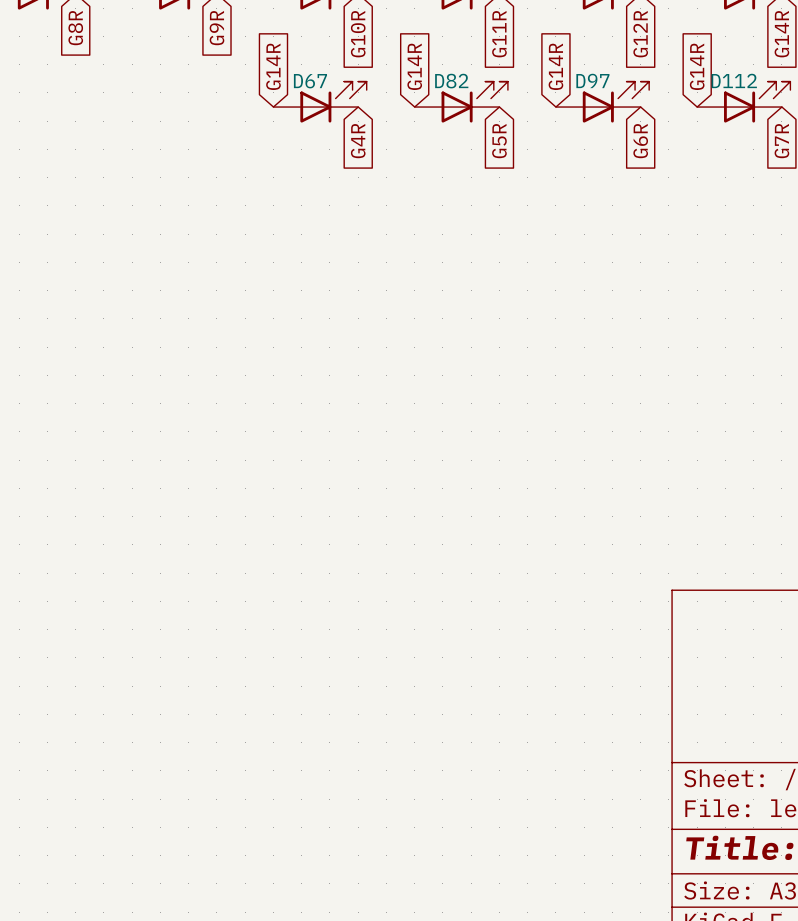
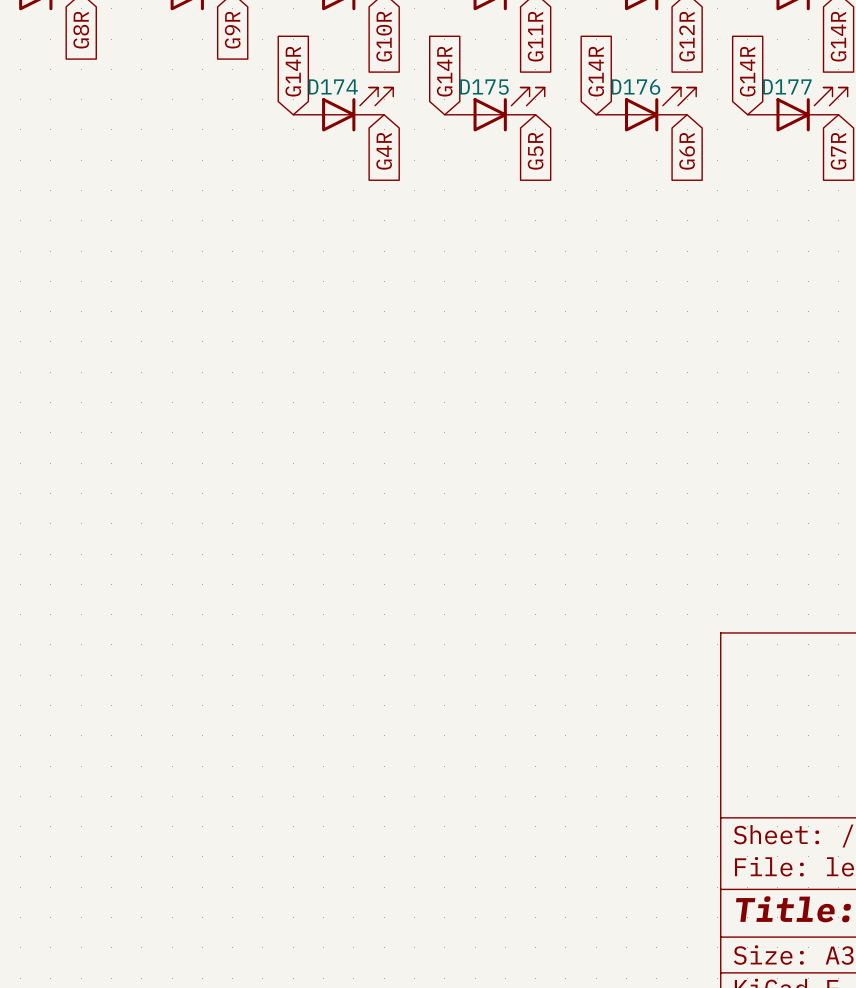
D97 name: D97 (592, 80) -> D176 (635, 87)
D112 name: D112 (734, 80) -> D177 (787, 86)
D67 name: D67 (310, 81) -> D174 (333, 86)
D82 name: D82 (451, 81) -> D175 (484, 87)

